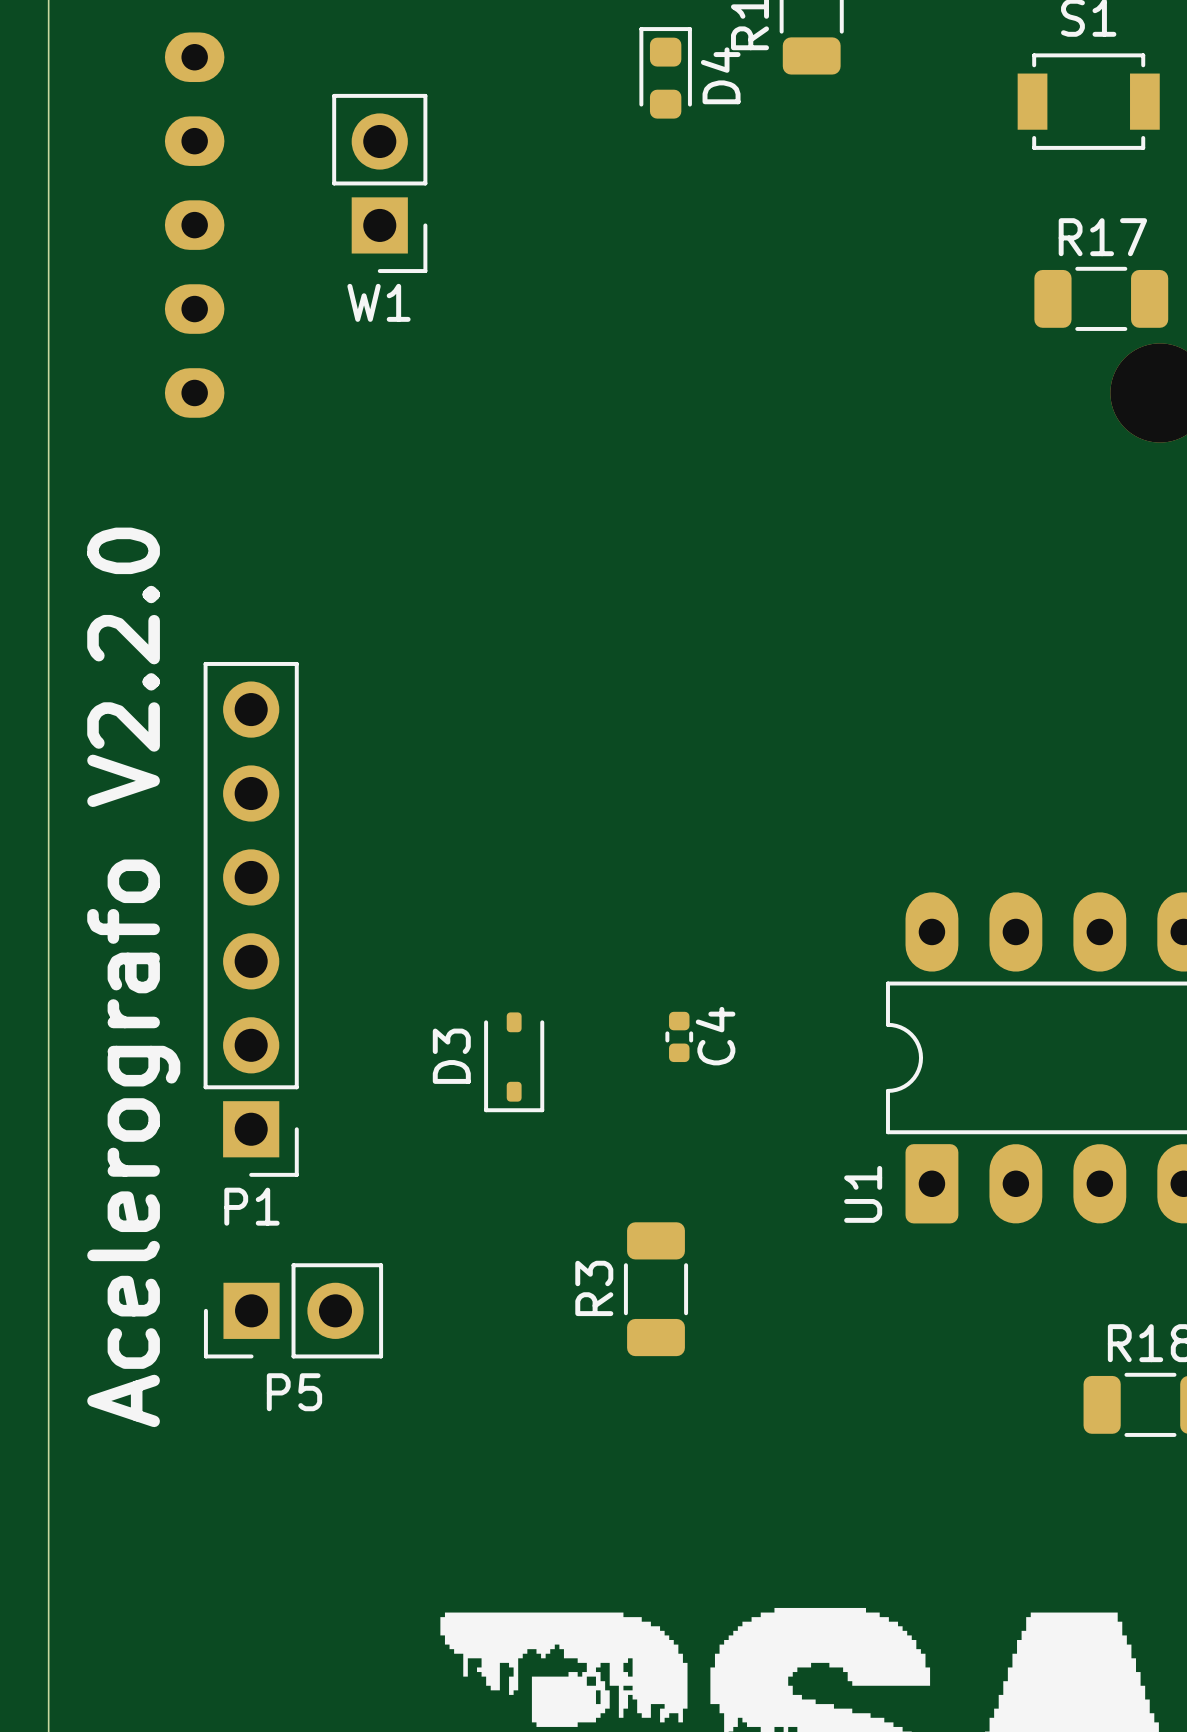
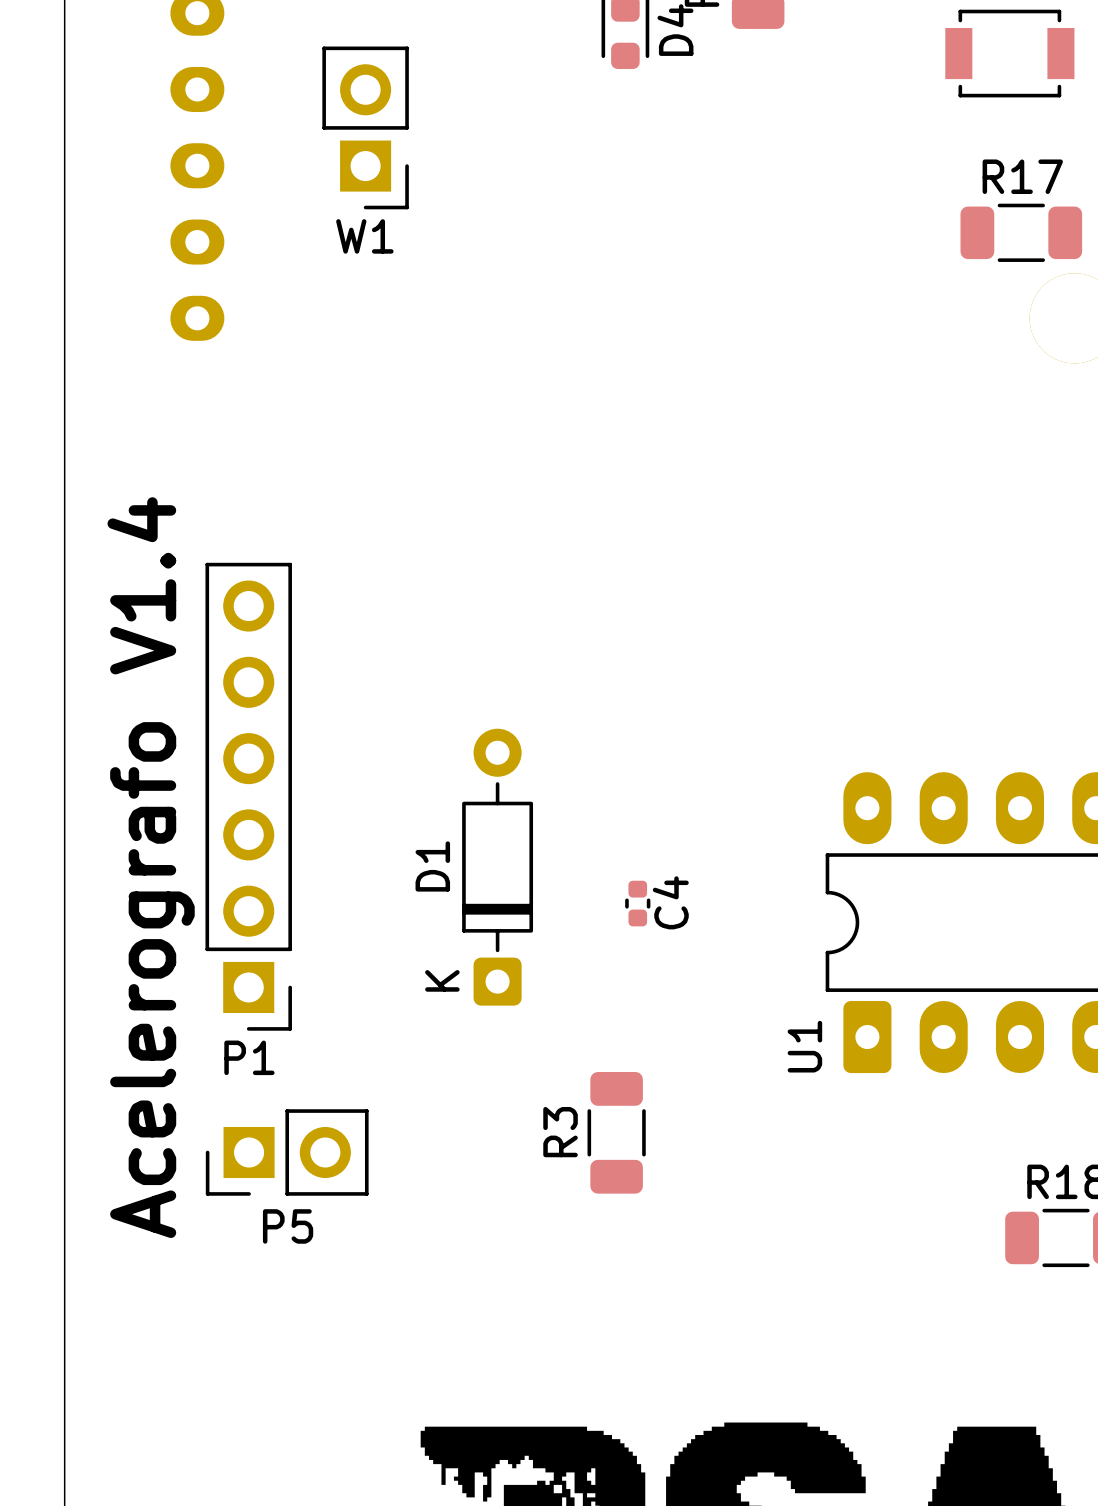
text: Acelerografo V2.2.0 (133, 977) -> Acelerografo V1.4 (151, 867)
D1: none -> (497, 867)
D3: (514, 1062) -> none

